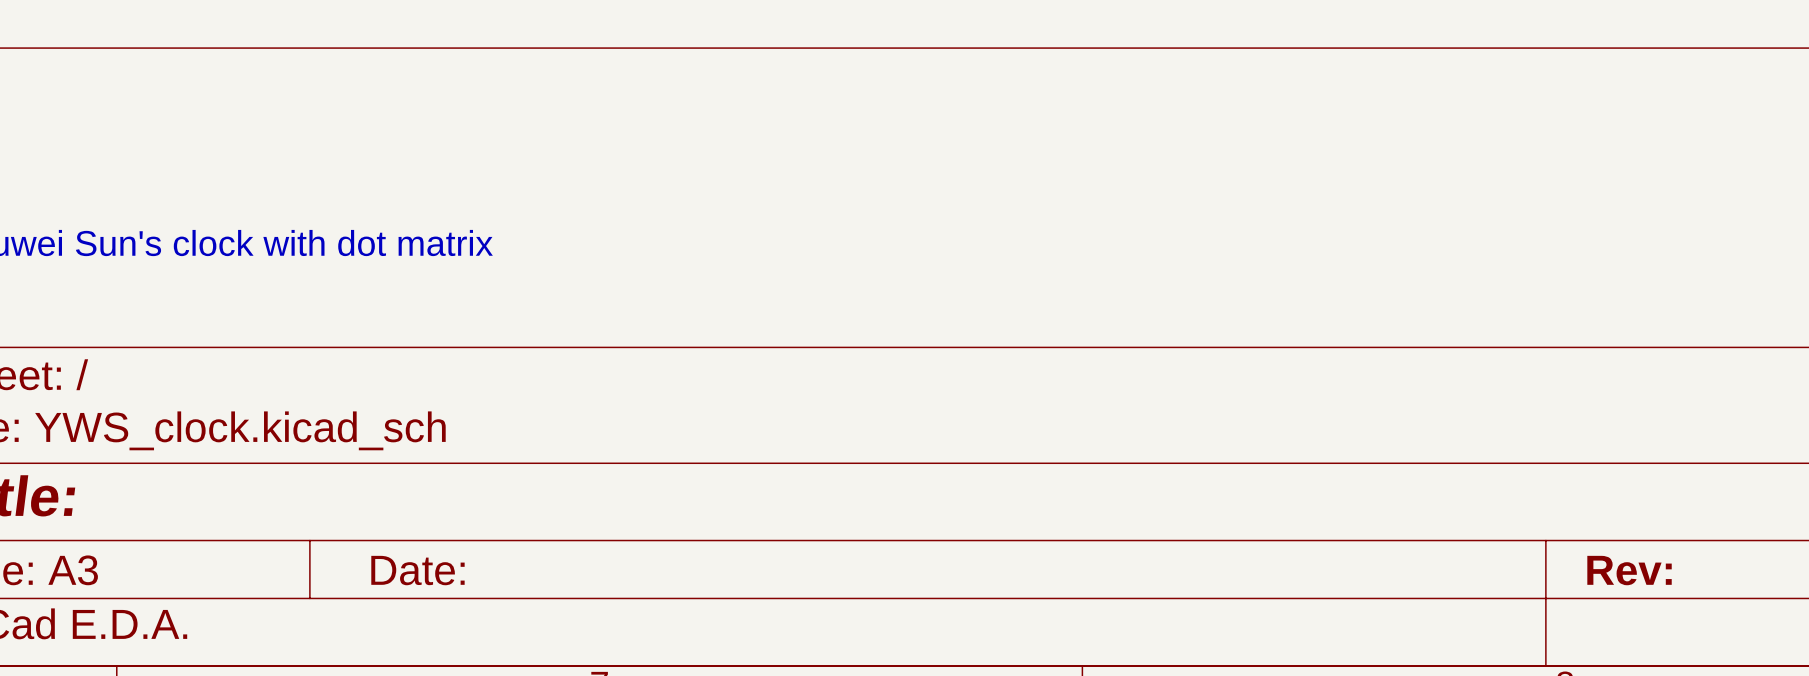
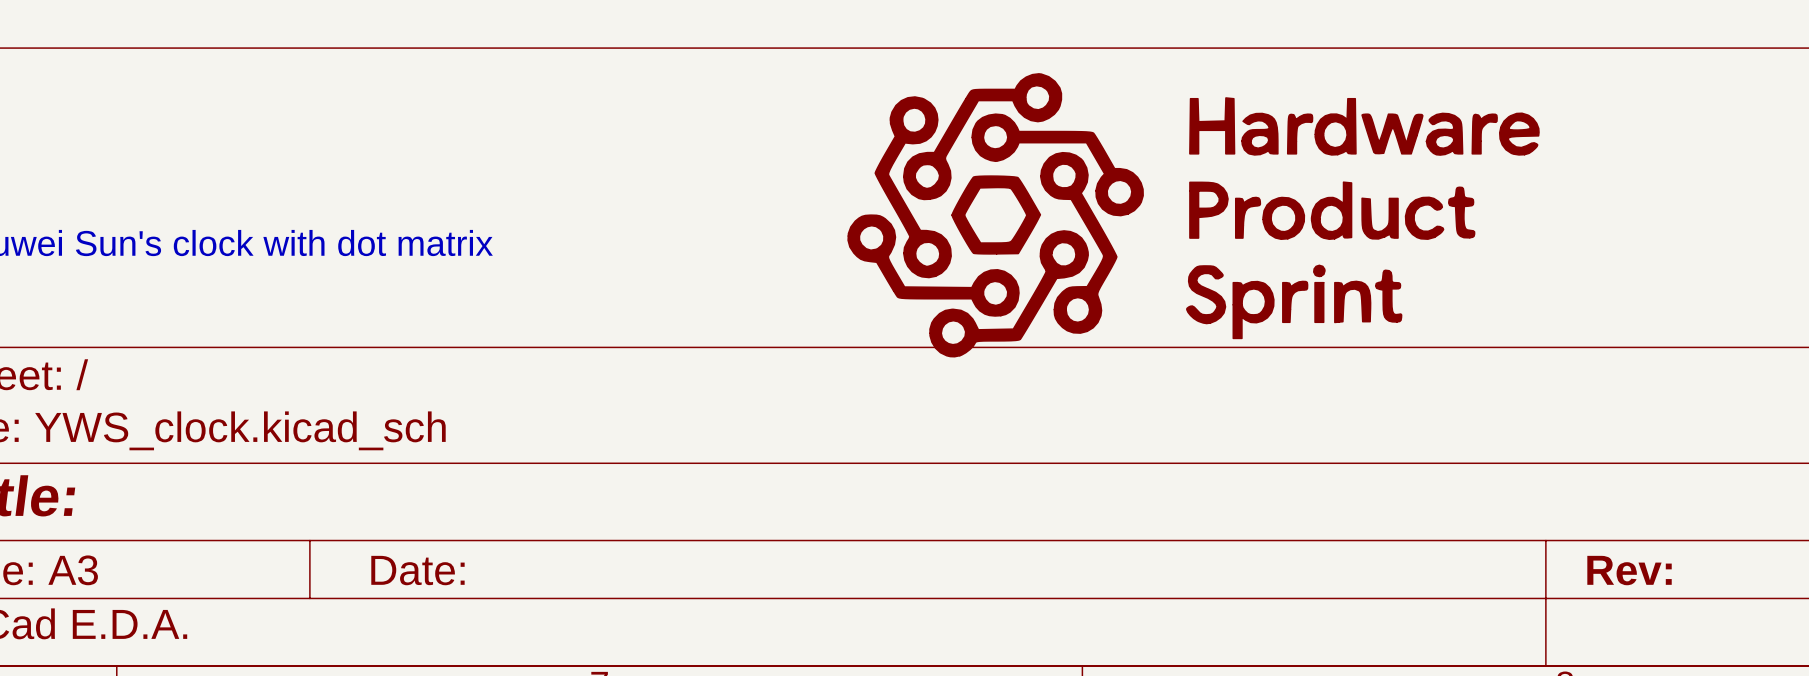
power symbol: none -> (1193, 215)

